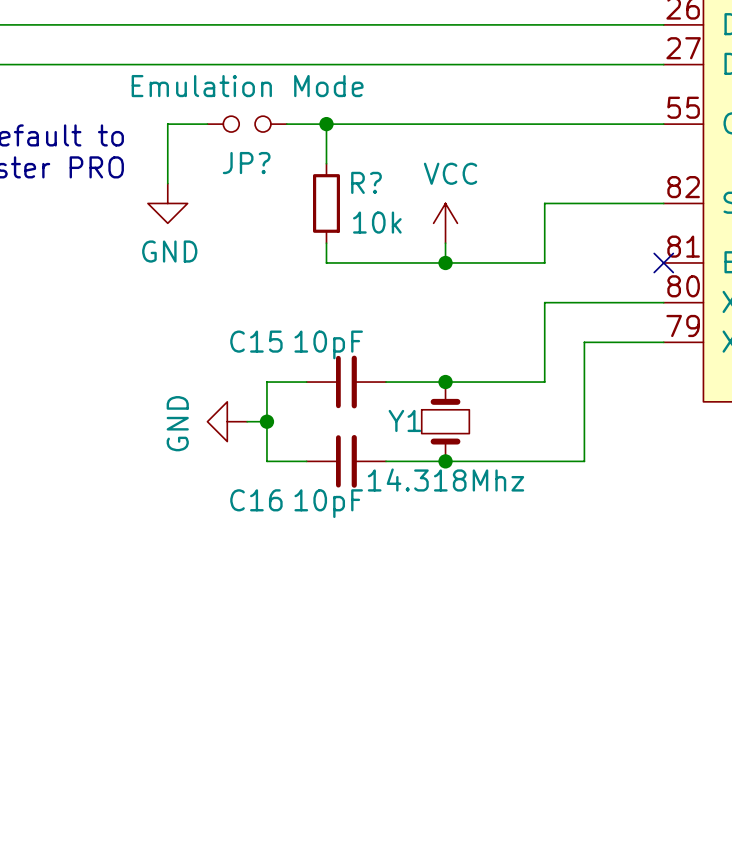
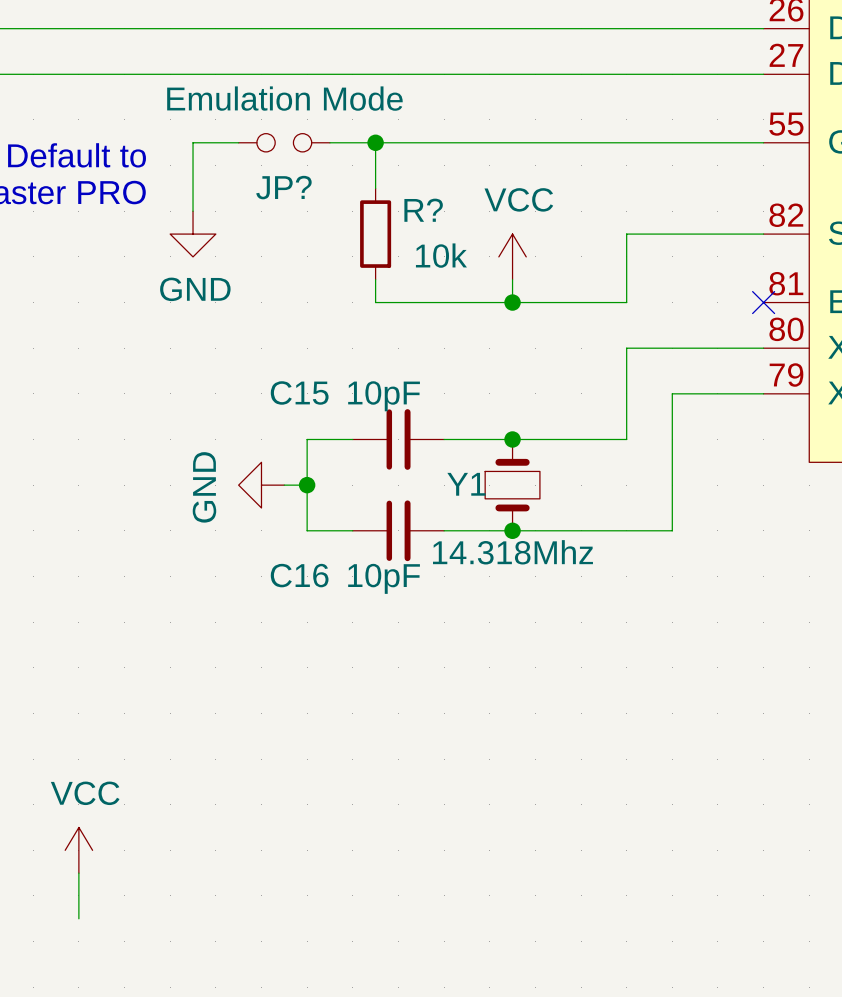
power symbol: none -> VCC (78, 850)
wire: none -> (78, 873) (78, 918)

